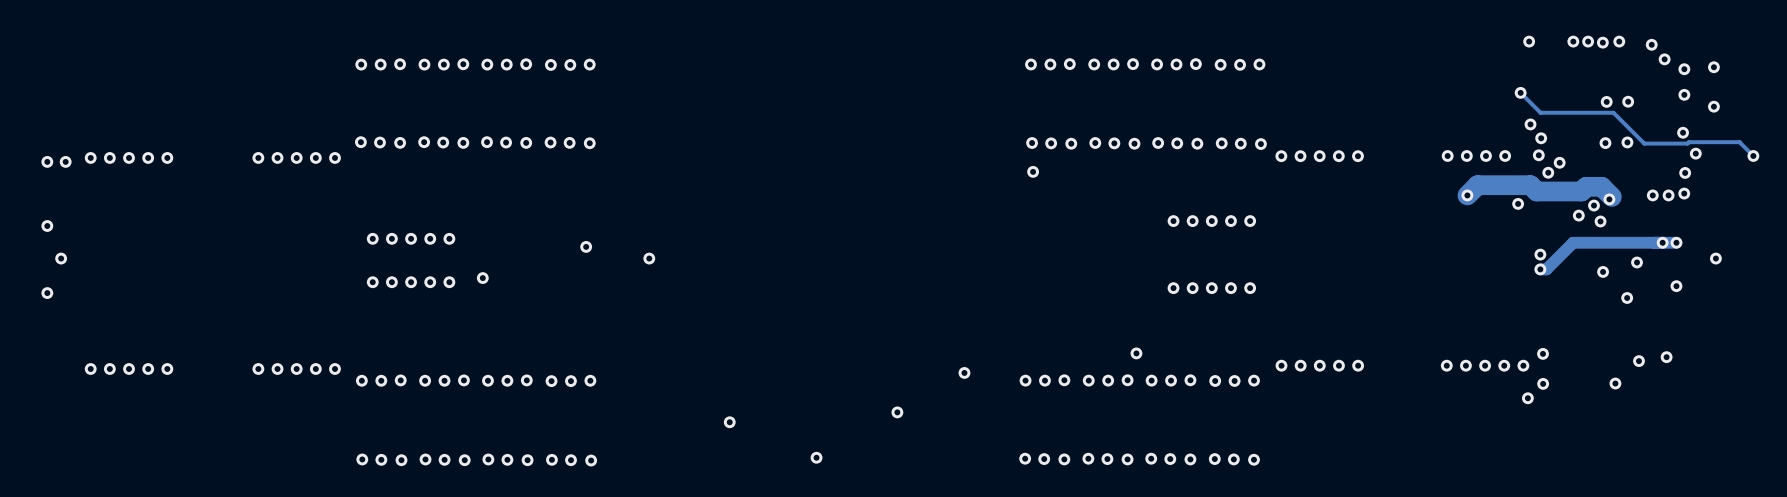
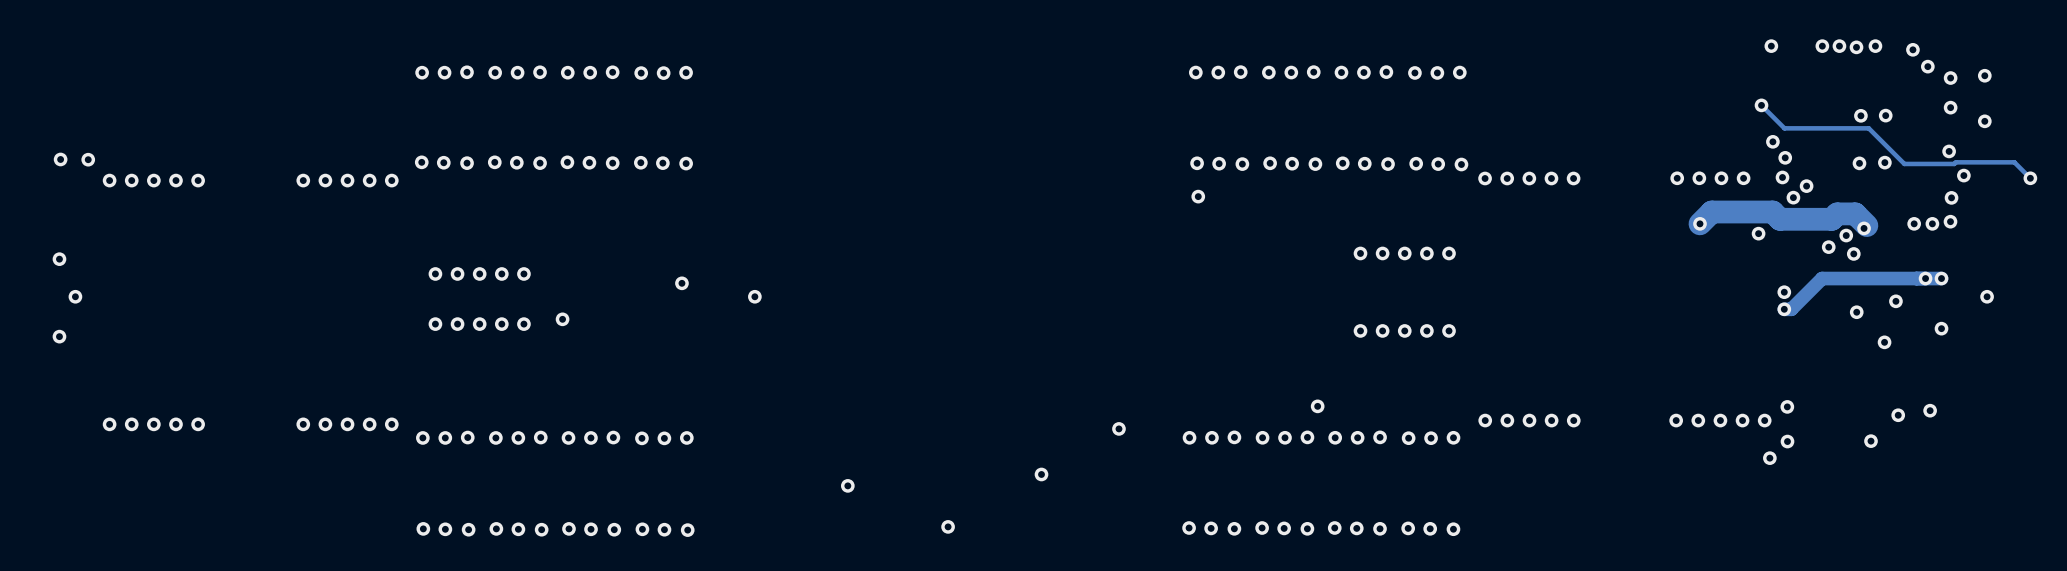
via: none -> (60, 159)
via: none -> (88, 159)
via: (47, 161) -> none
via: (65, 161) -> none

